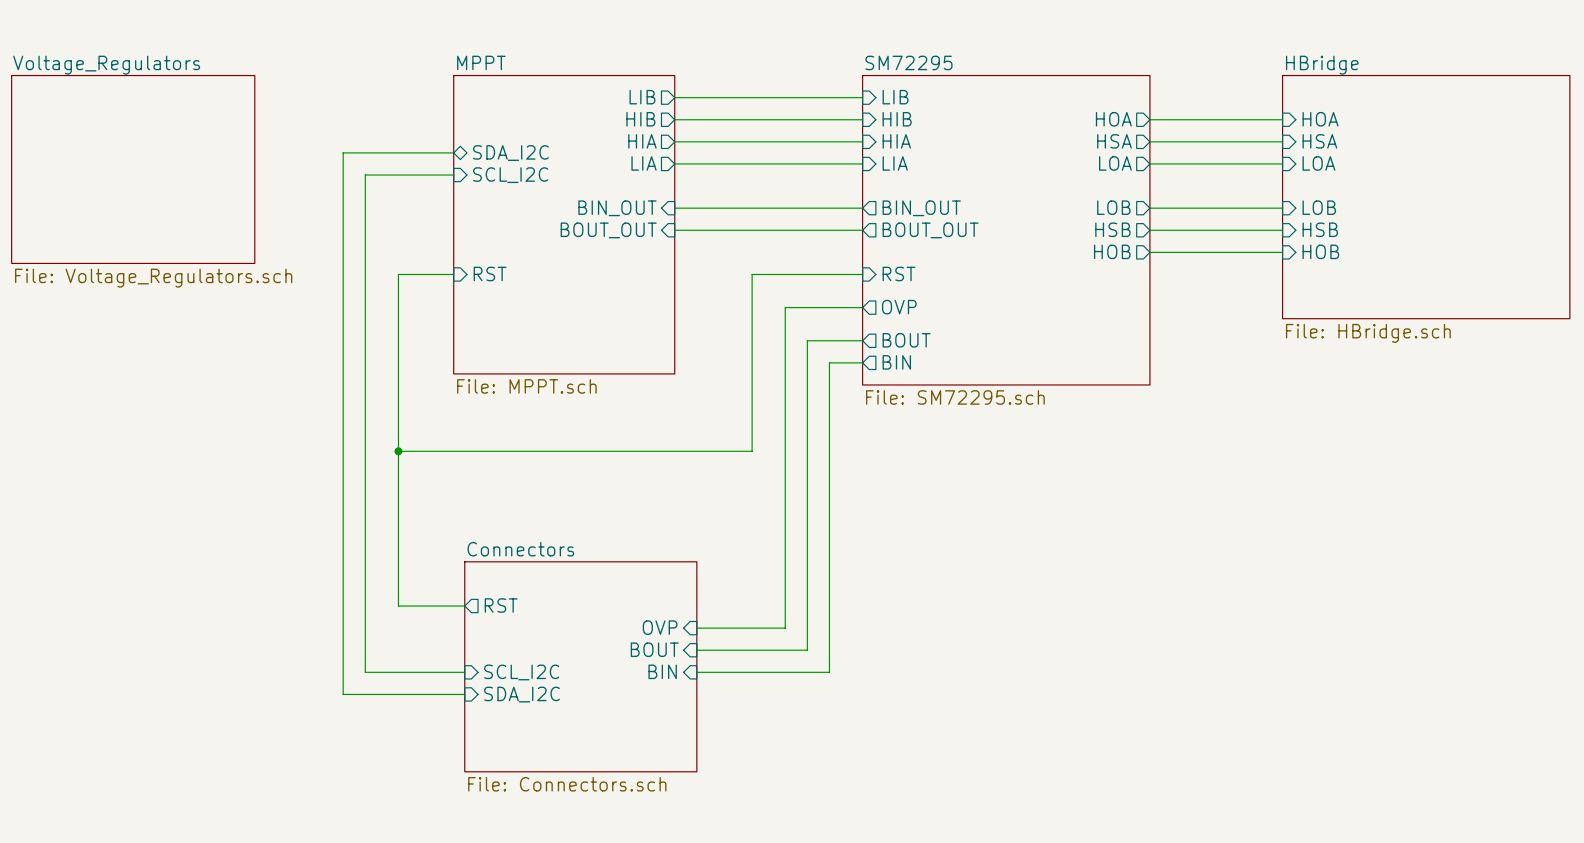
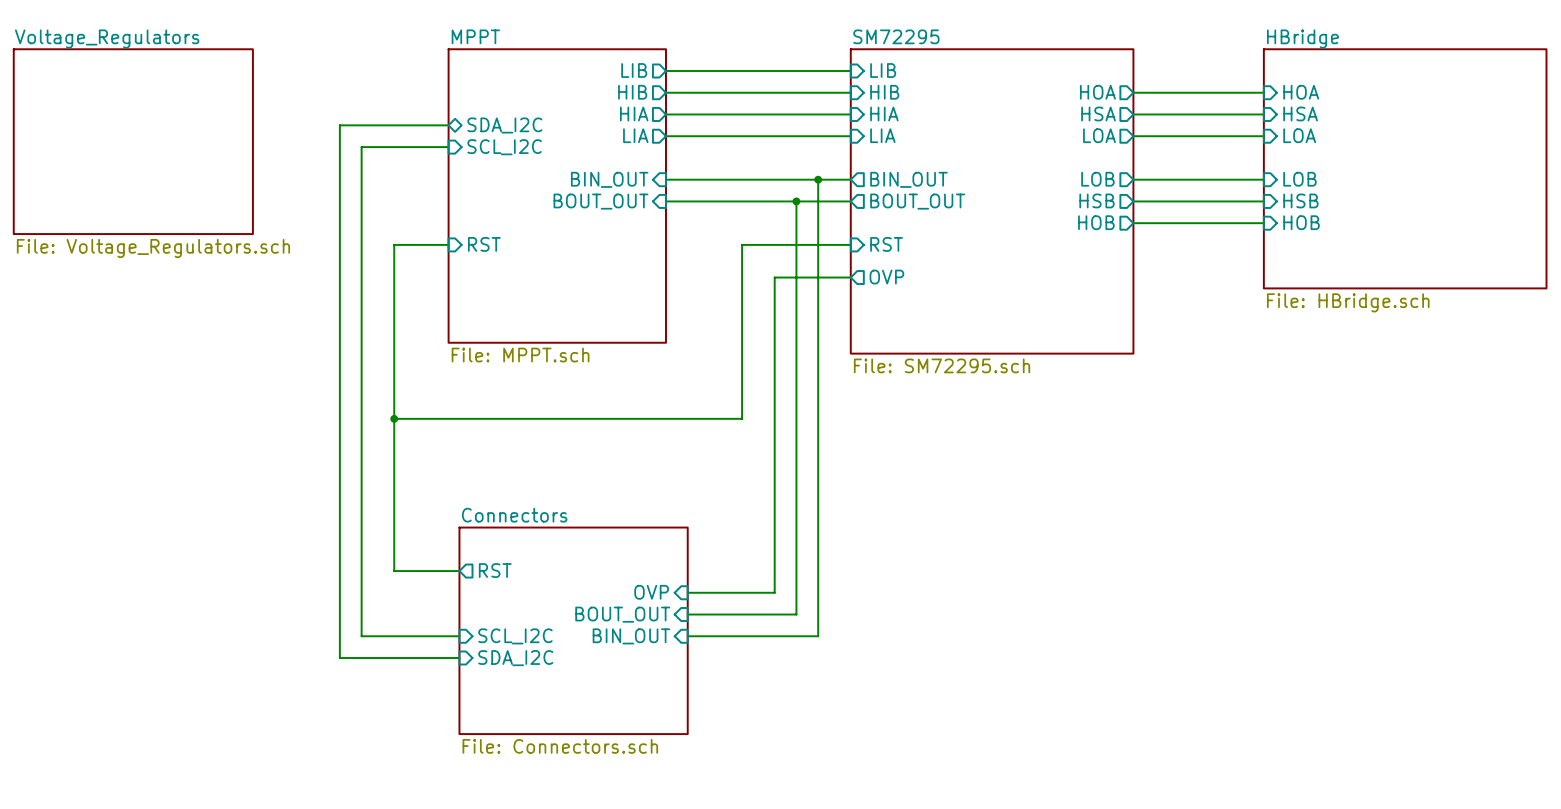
junction: none -> (818, 179)
junction: none -> (796, 201)
wire: (807, 340) (862, 340) -> (796, 310) (796, 201)
sheet pin: BOUT (906, 340) -> none
wire: (829, 362) (862, 362) -> (818, 331) (818, 179)
sheet pin: BIN (896, 362) -> none
sheet pin: BOUT (654, 649) -> BOUT_OUT (622, 614)
sheet pin: BIN (662, 671) -> BIN_OUT (631, 636)

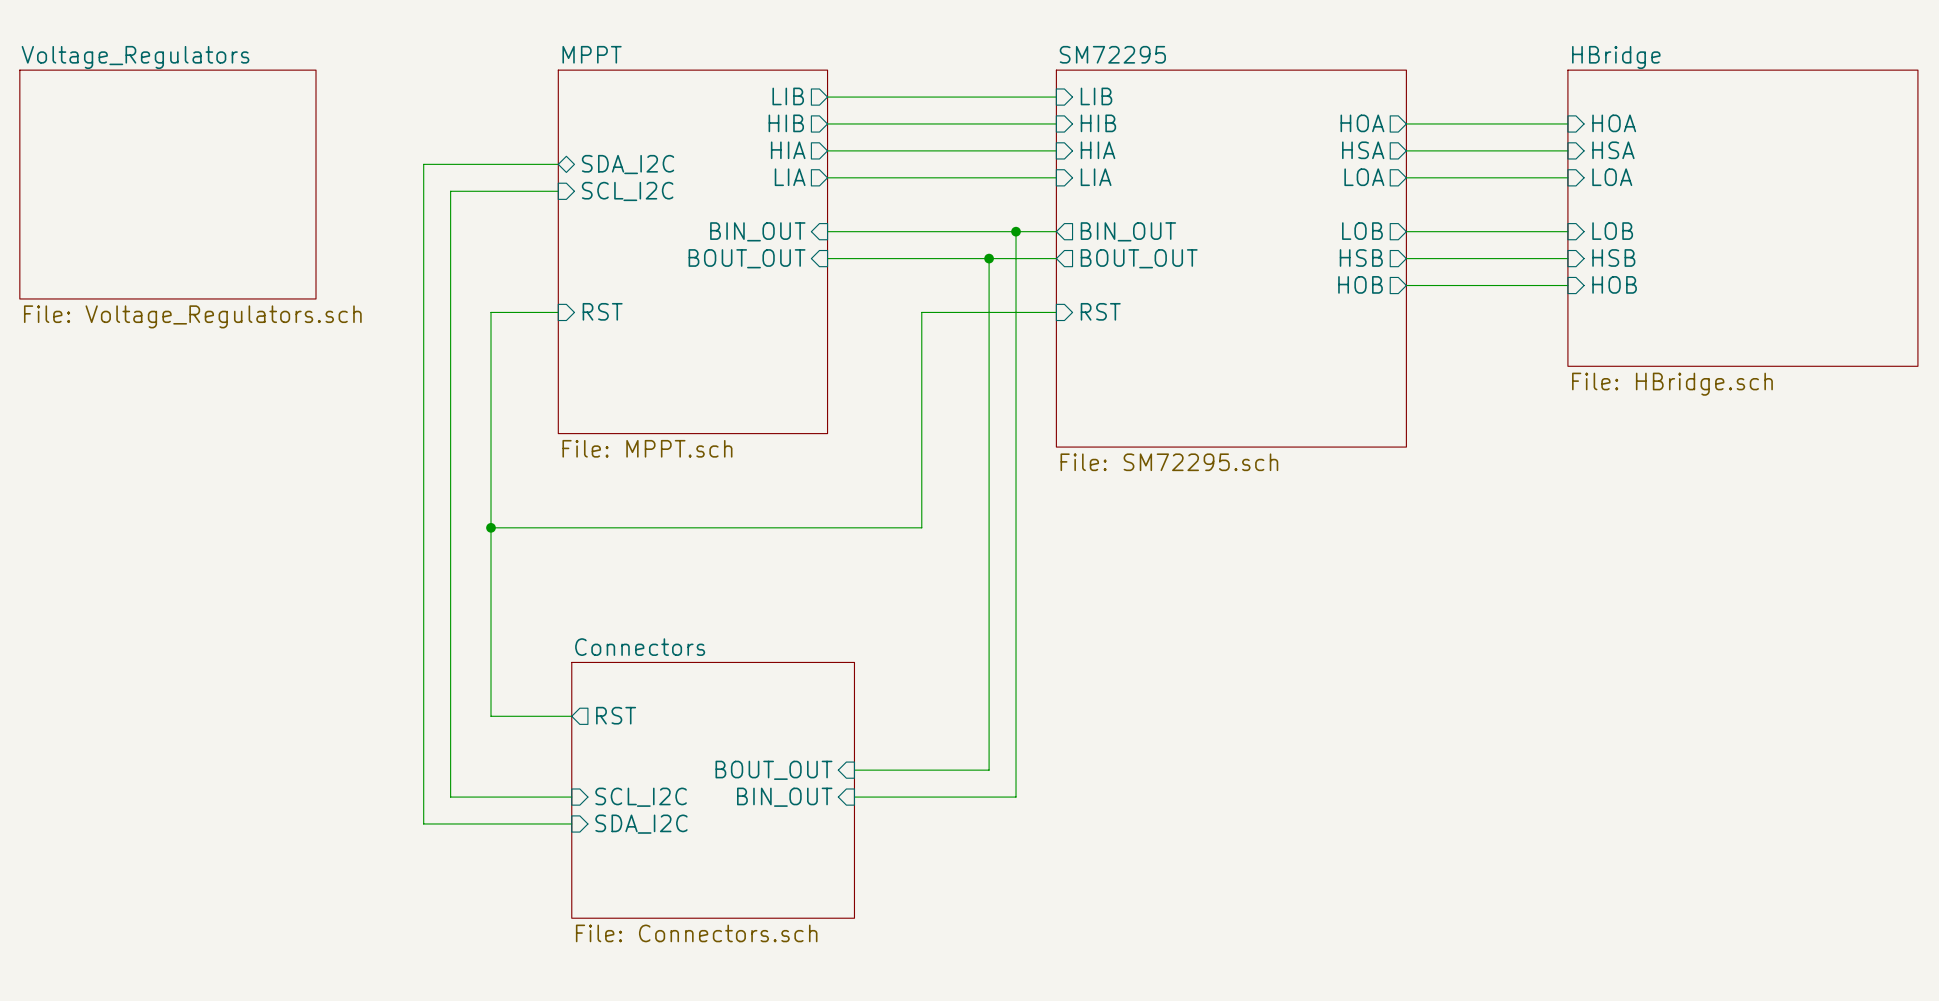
wire: (850, 277) (774, 277) (774, 592) (687, 592) -> none
sheet pin: OVP (886, 277) -> none
sheet pin: OVP (651, 592) -> none

